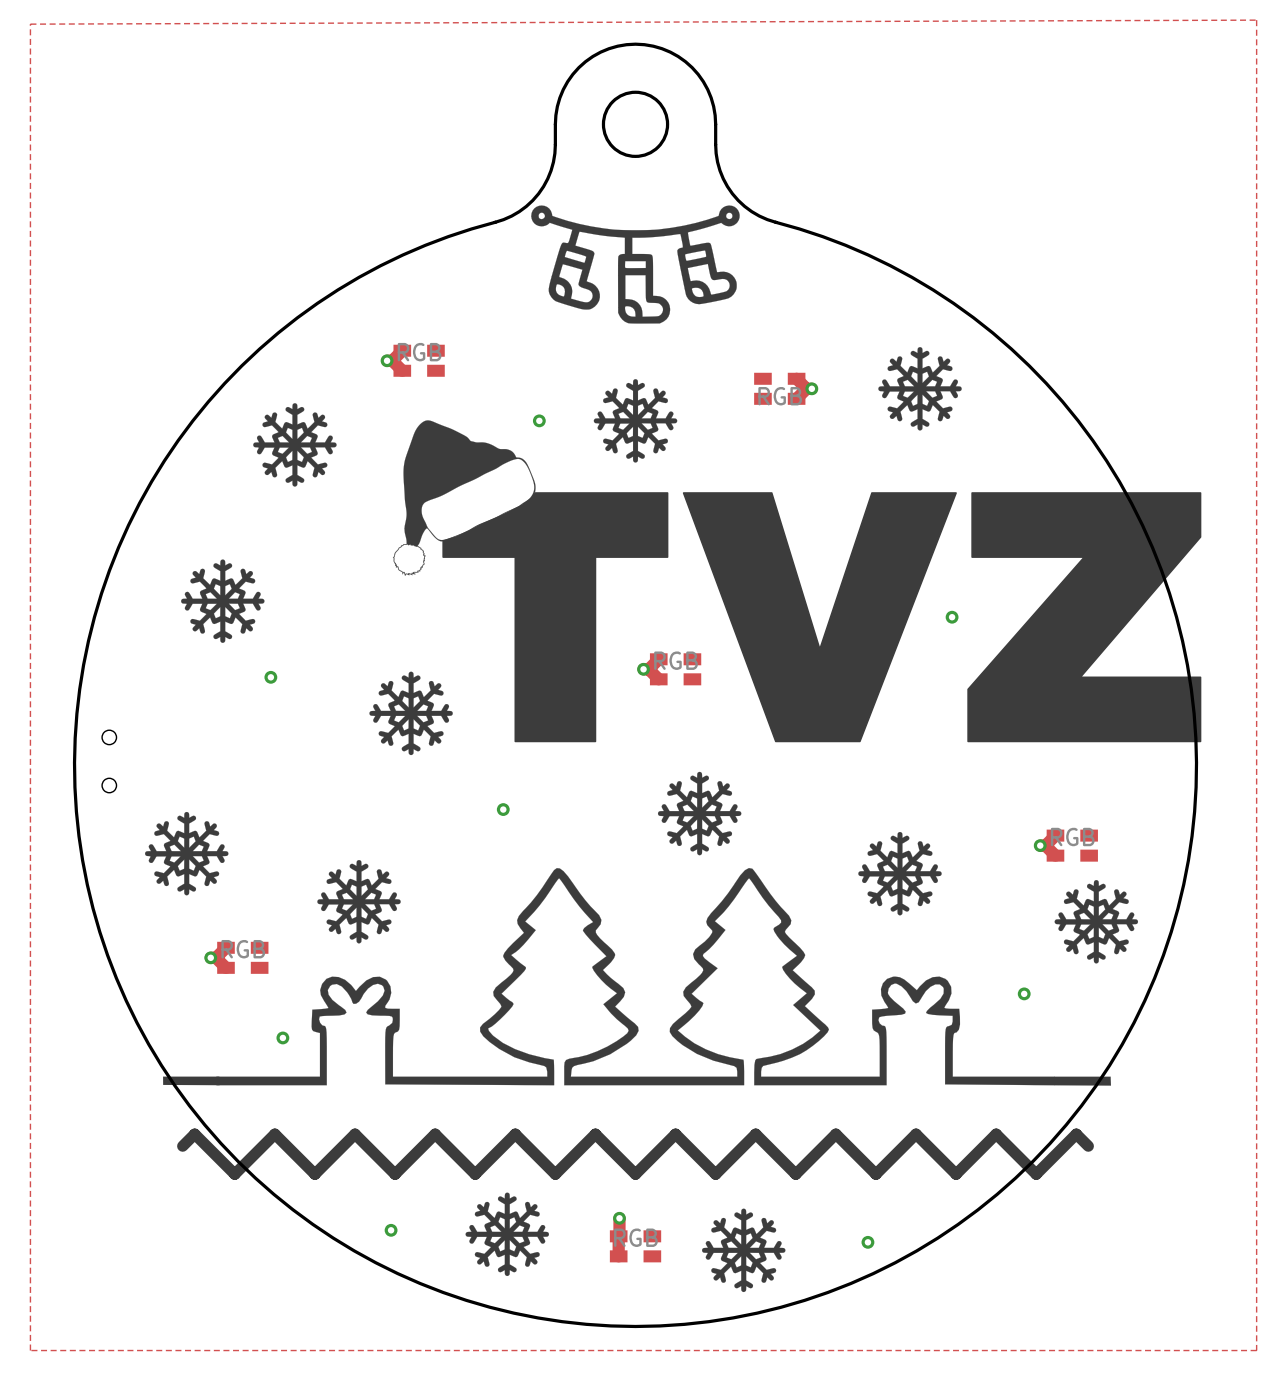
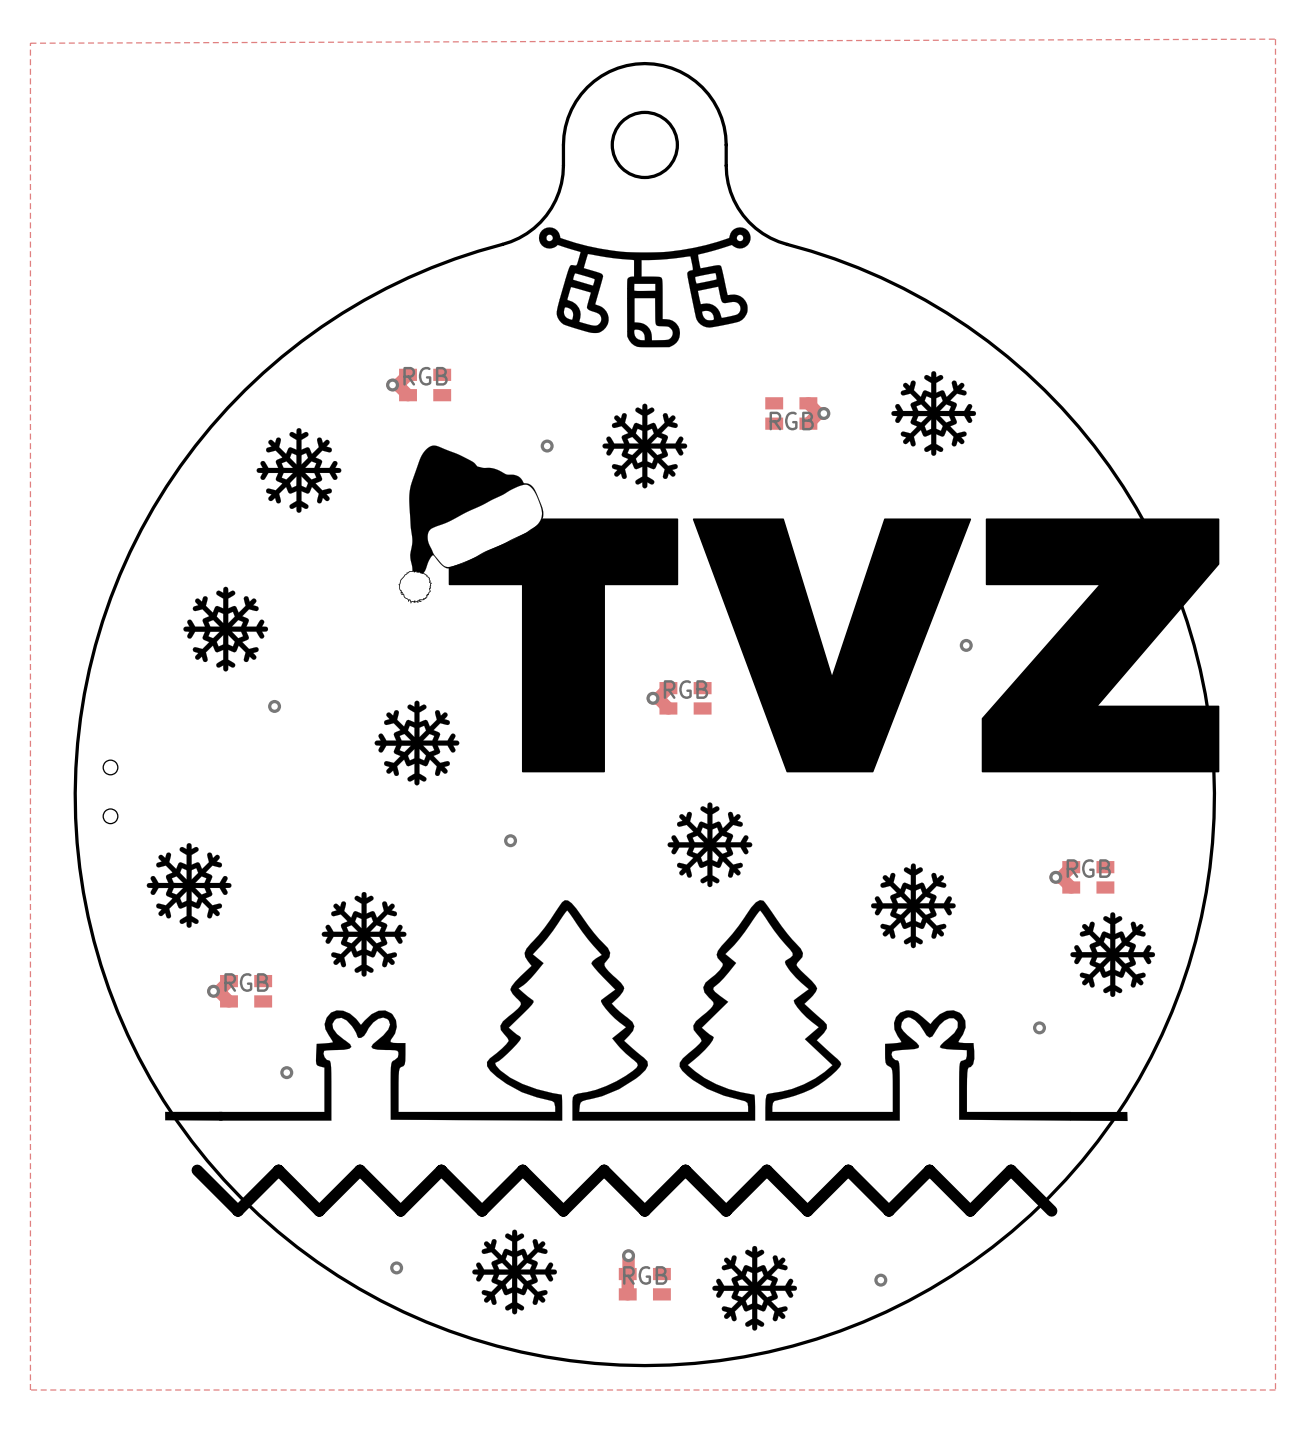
line: (194, 1134) (182, 1146) -> none
line: (1088, 1146) (1076, 1134) (1036, 1174) -> none

